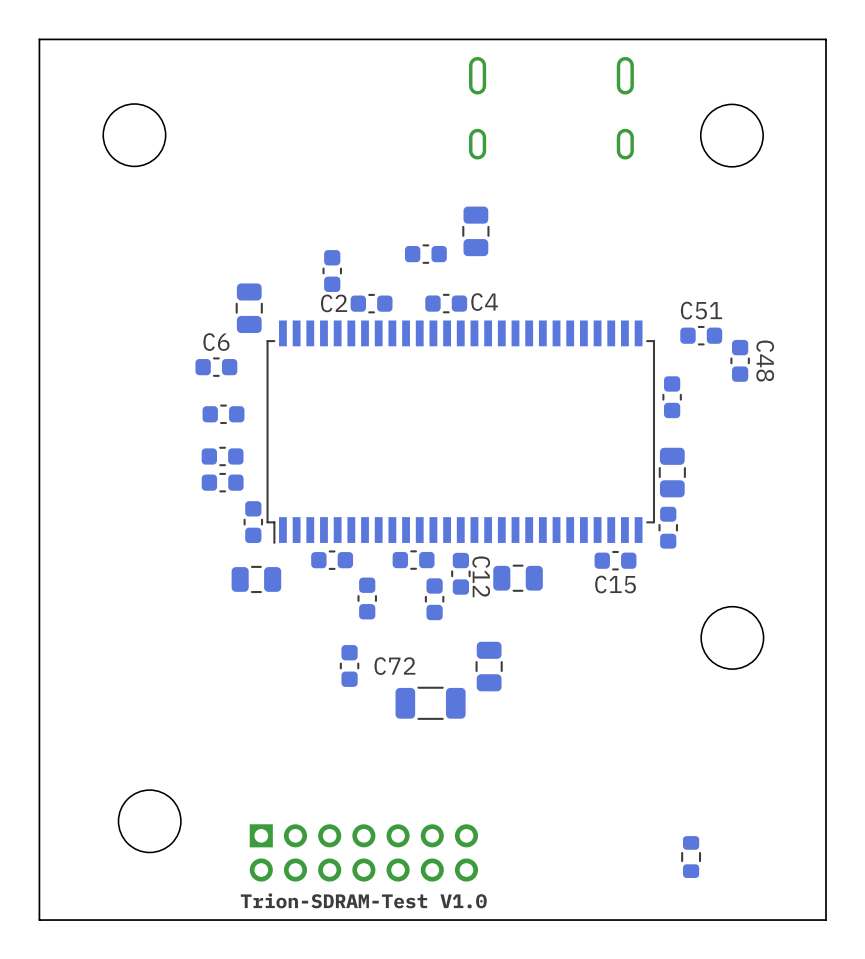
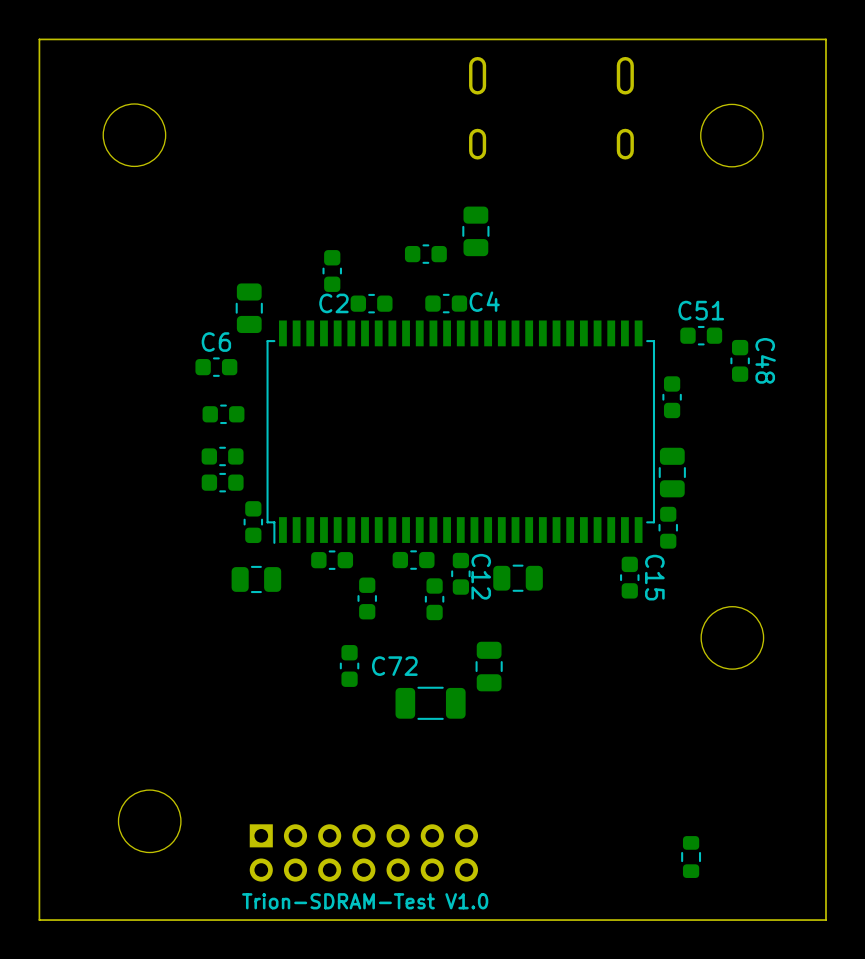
C15 rotation: 0° (615, 560) -> 90° clockwise (629, 577)
C15 name position: C15 (615, 584) -> C15 (654, 577)

